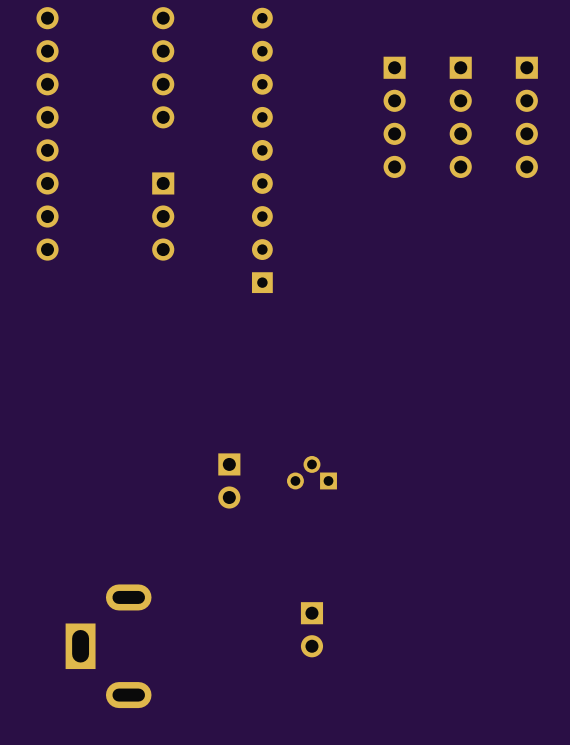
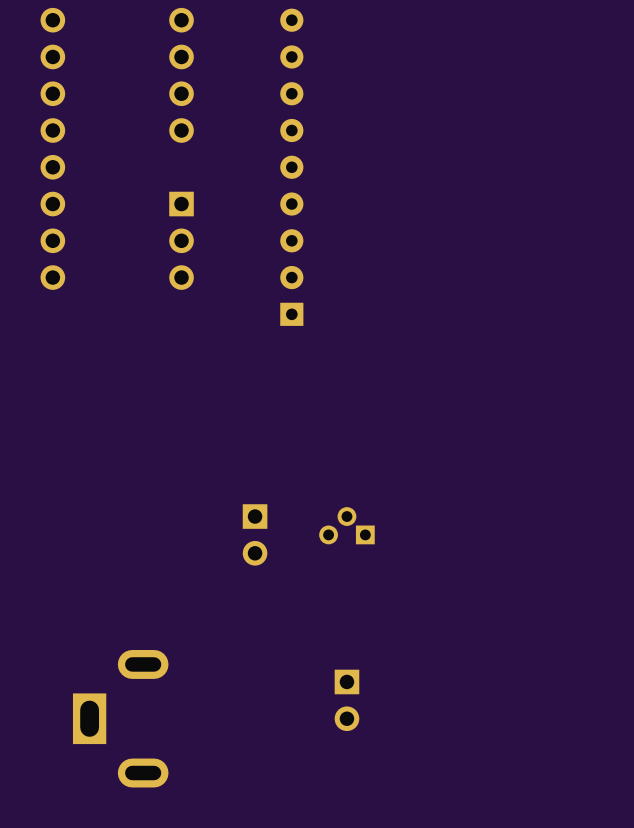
part: (394, 117) -> none
part: (460, 117) -> none
part: (526, 117) -> none

